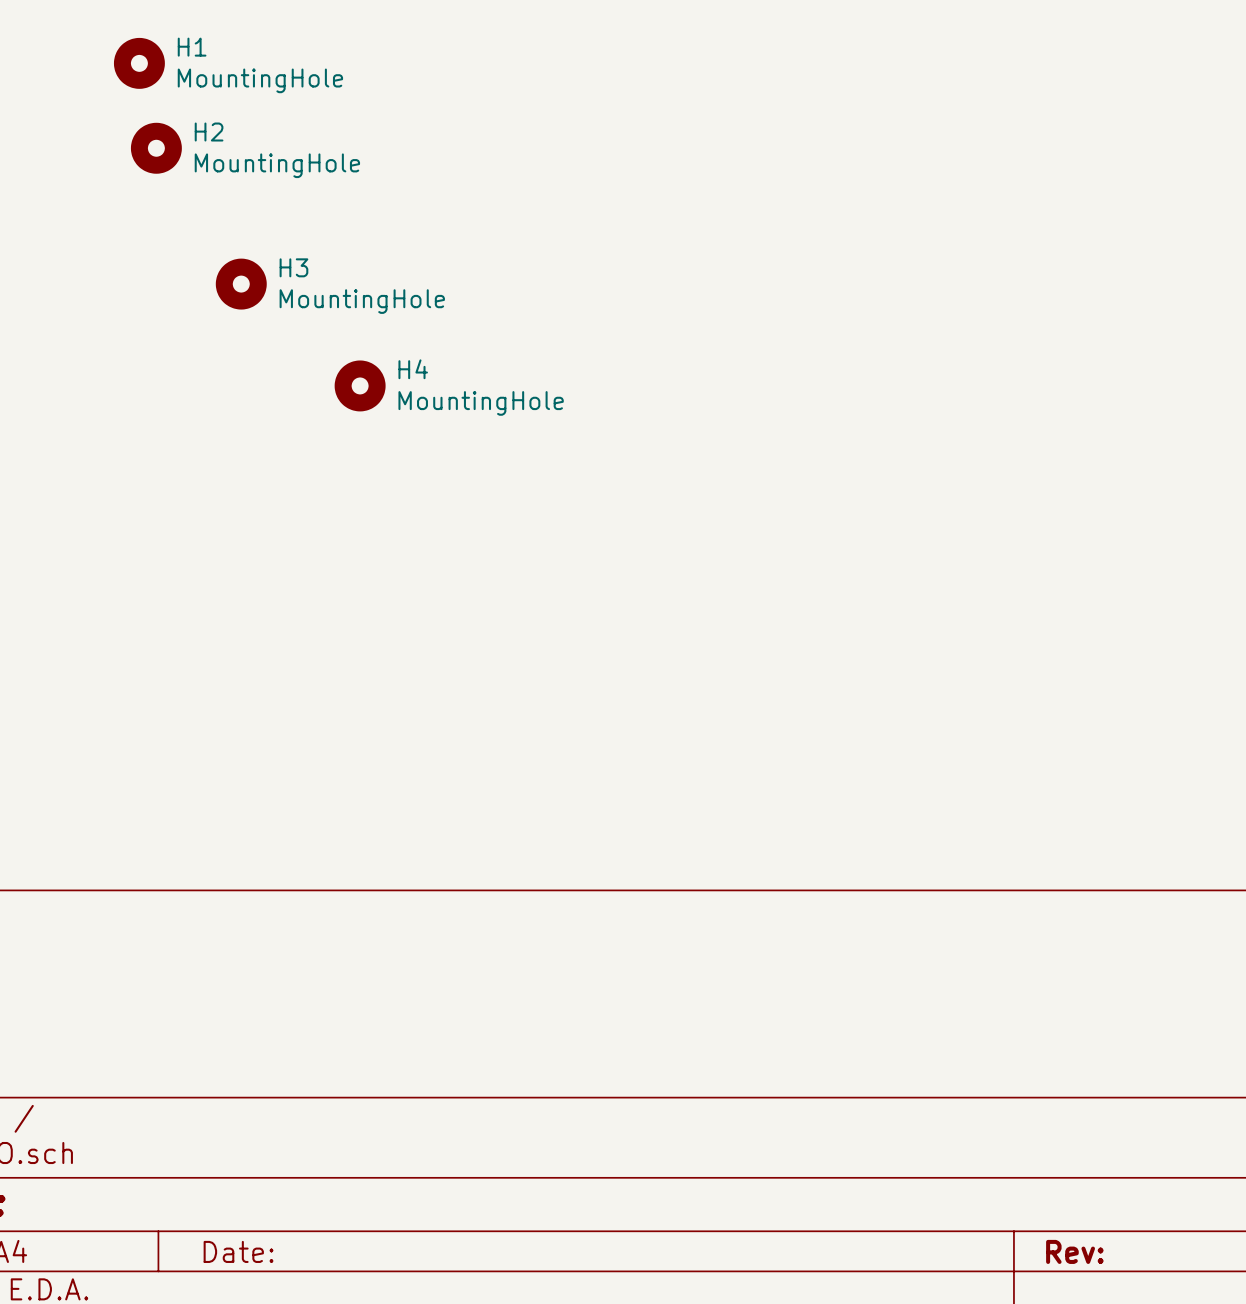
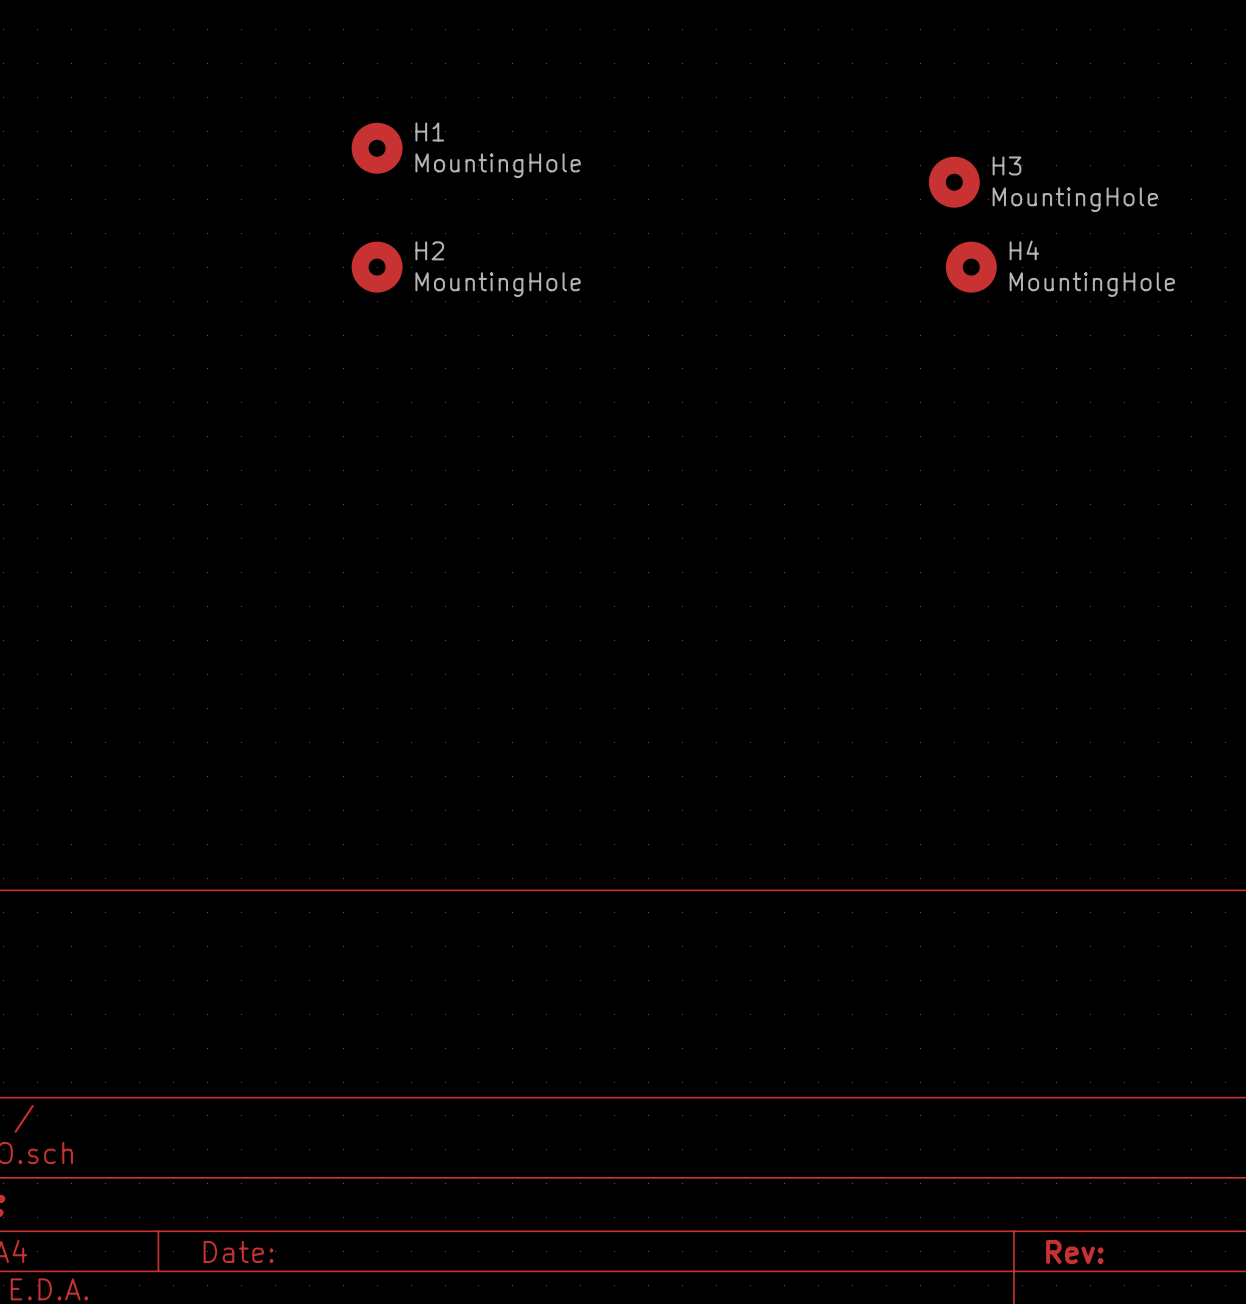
H1 position: (139, 63) -> (377, 148)
H2 position: (156, 148) -> (377, 267)
H3 position: (241, 284) -> (954, 182)
H4 position: (360, 385) -> (971, 267)

